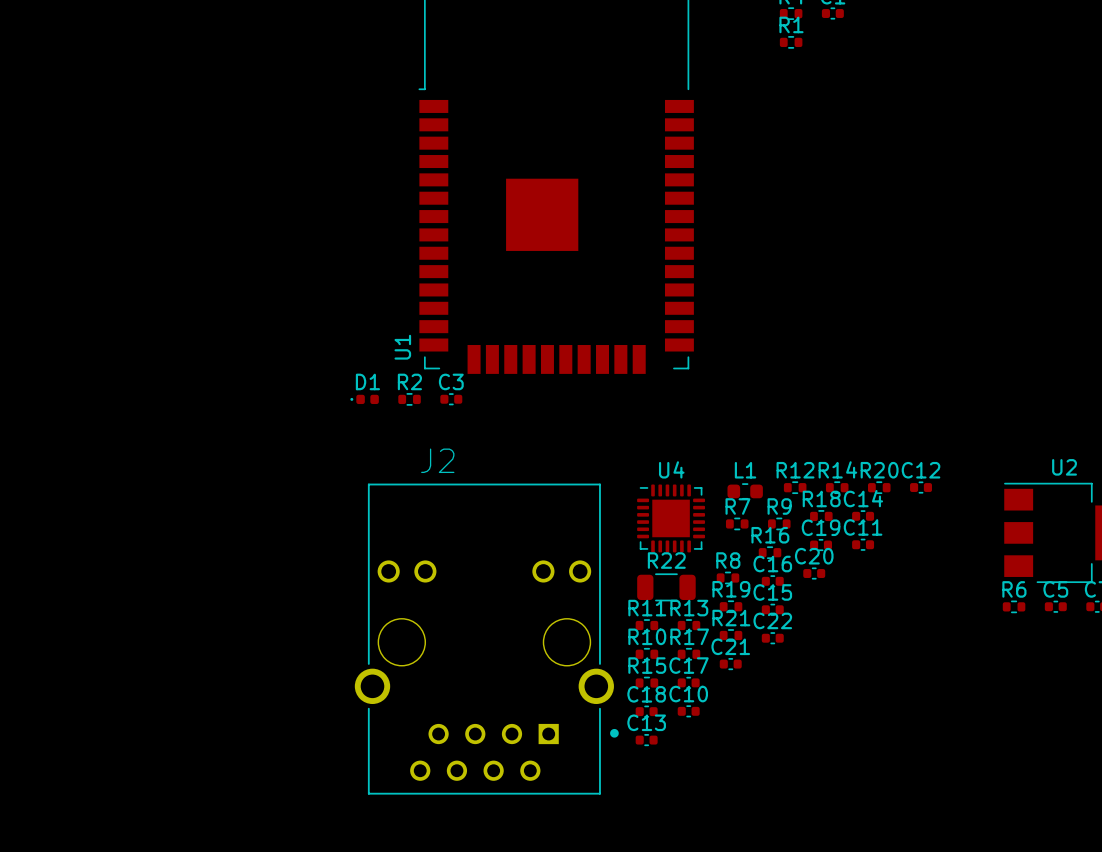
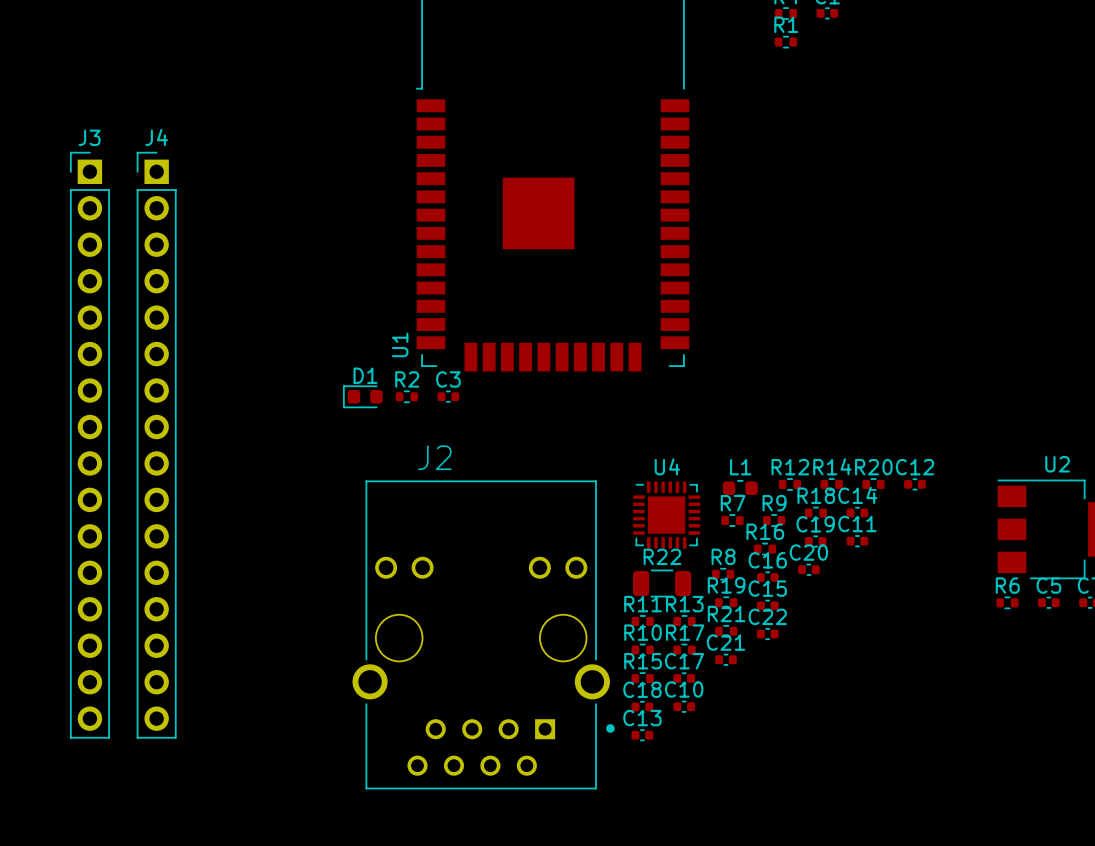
D1 footprint: [350, 394, 379, 405] -> [343, 385, 383, 409]
J3: none -> (89, 445)
J4: none -> (156, 445)

